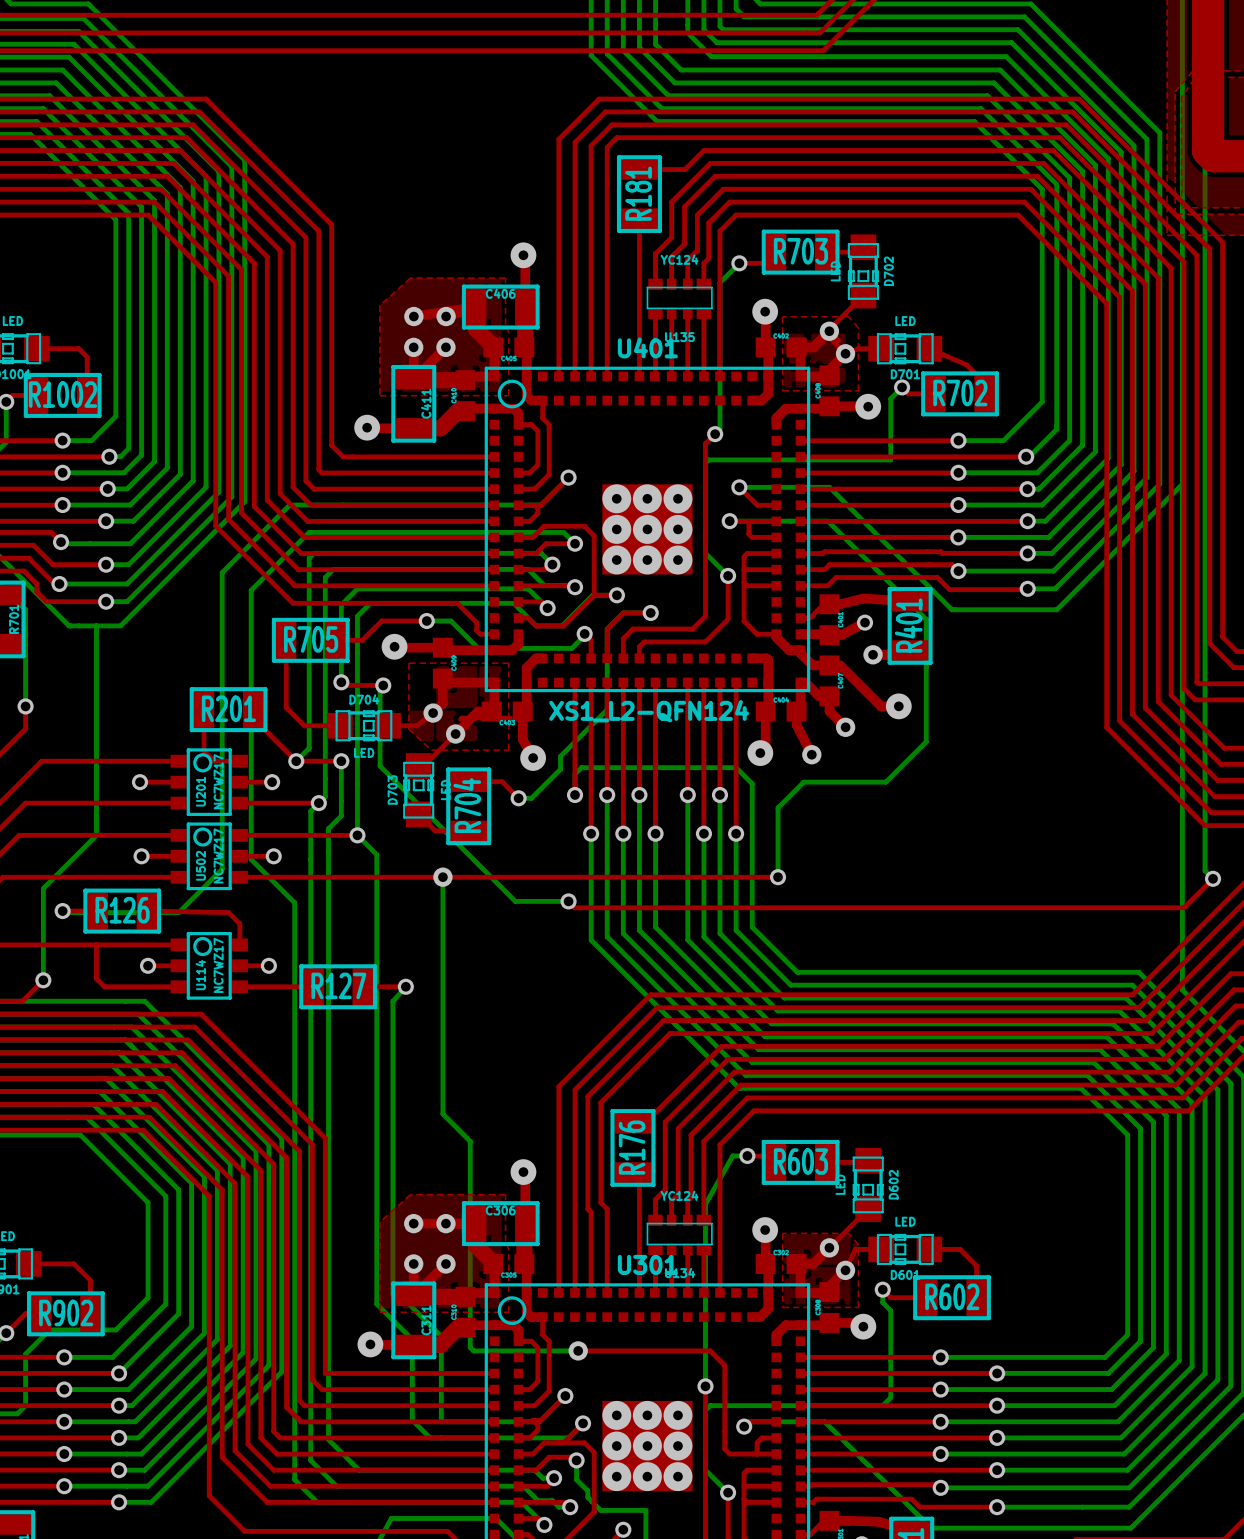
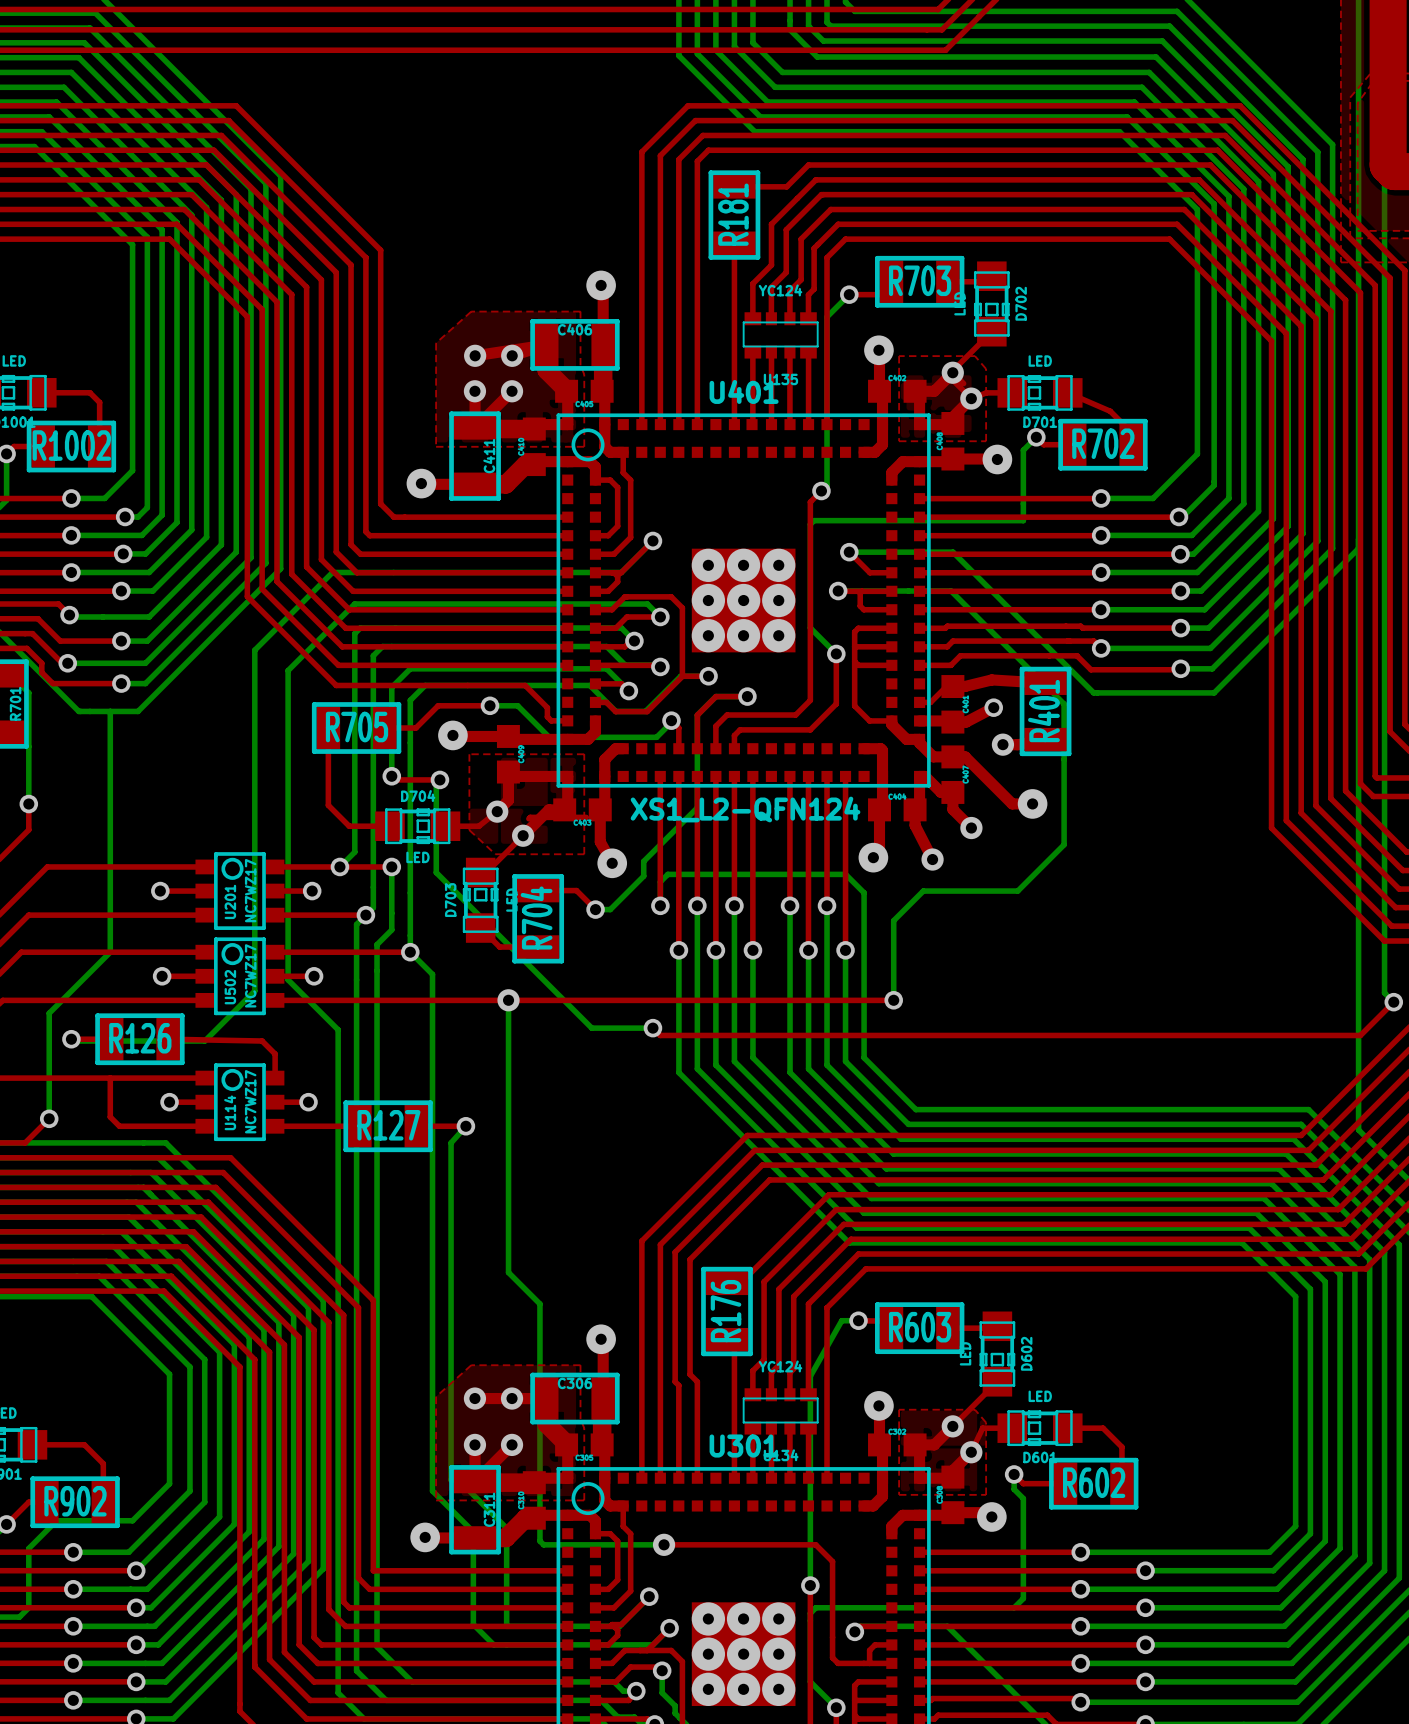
top track: (204, 709) (204, 751) (214, 761) (239, 761) -> none
R201: (228, 709) -> none
top track: (253, 709) (253, 718) (296, 761) -> (275, 866) (339, 866)

